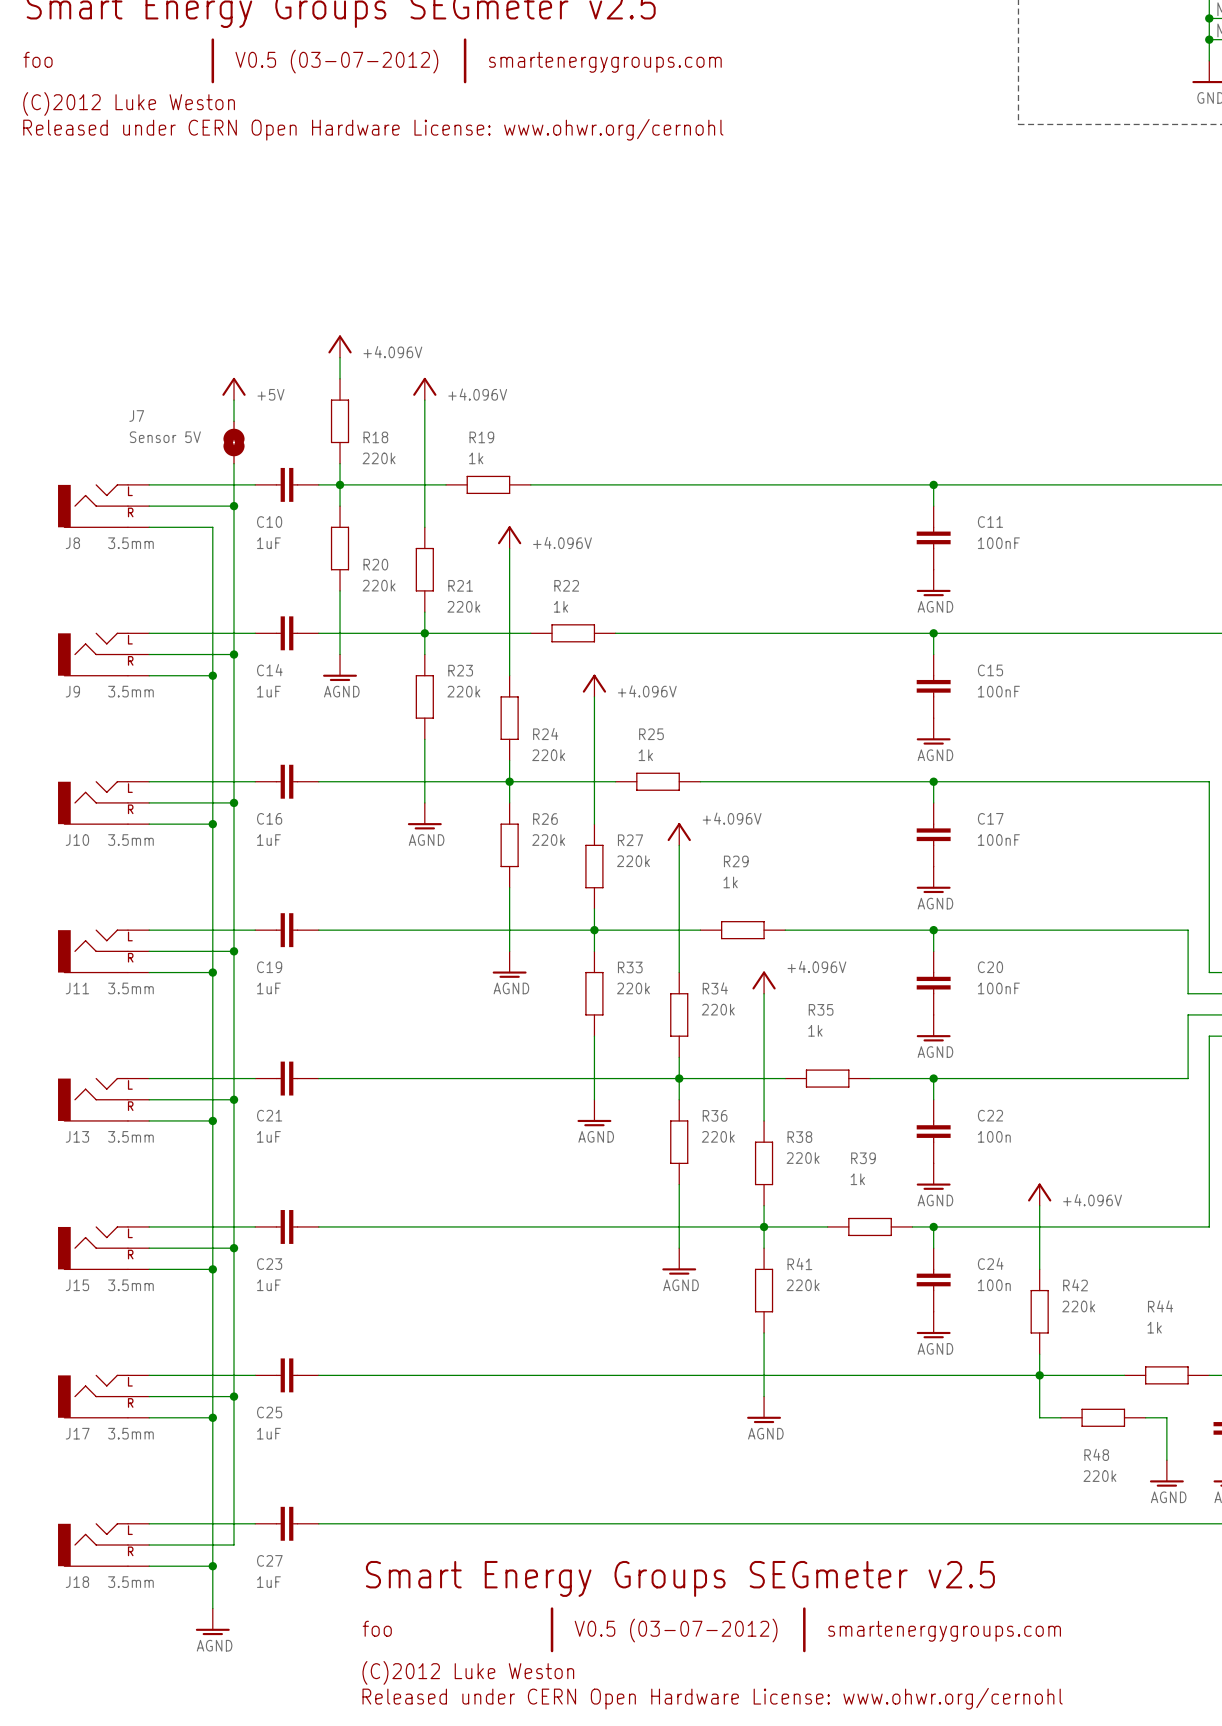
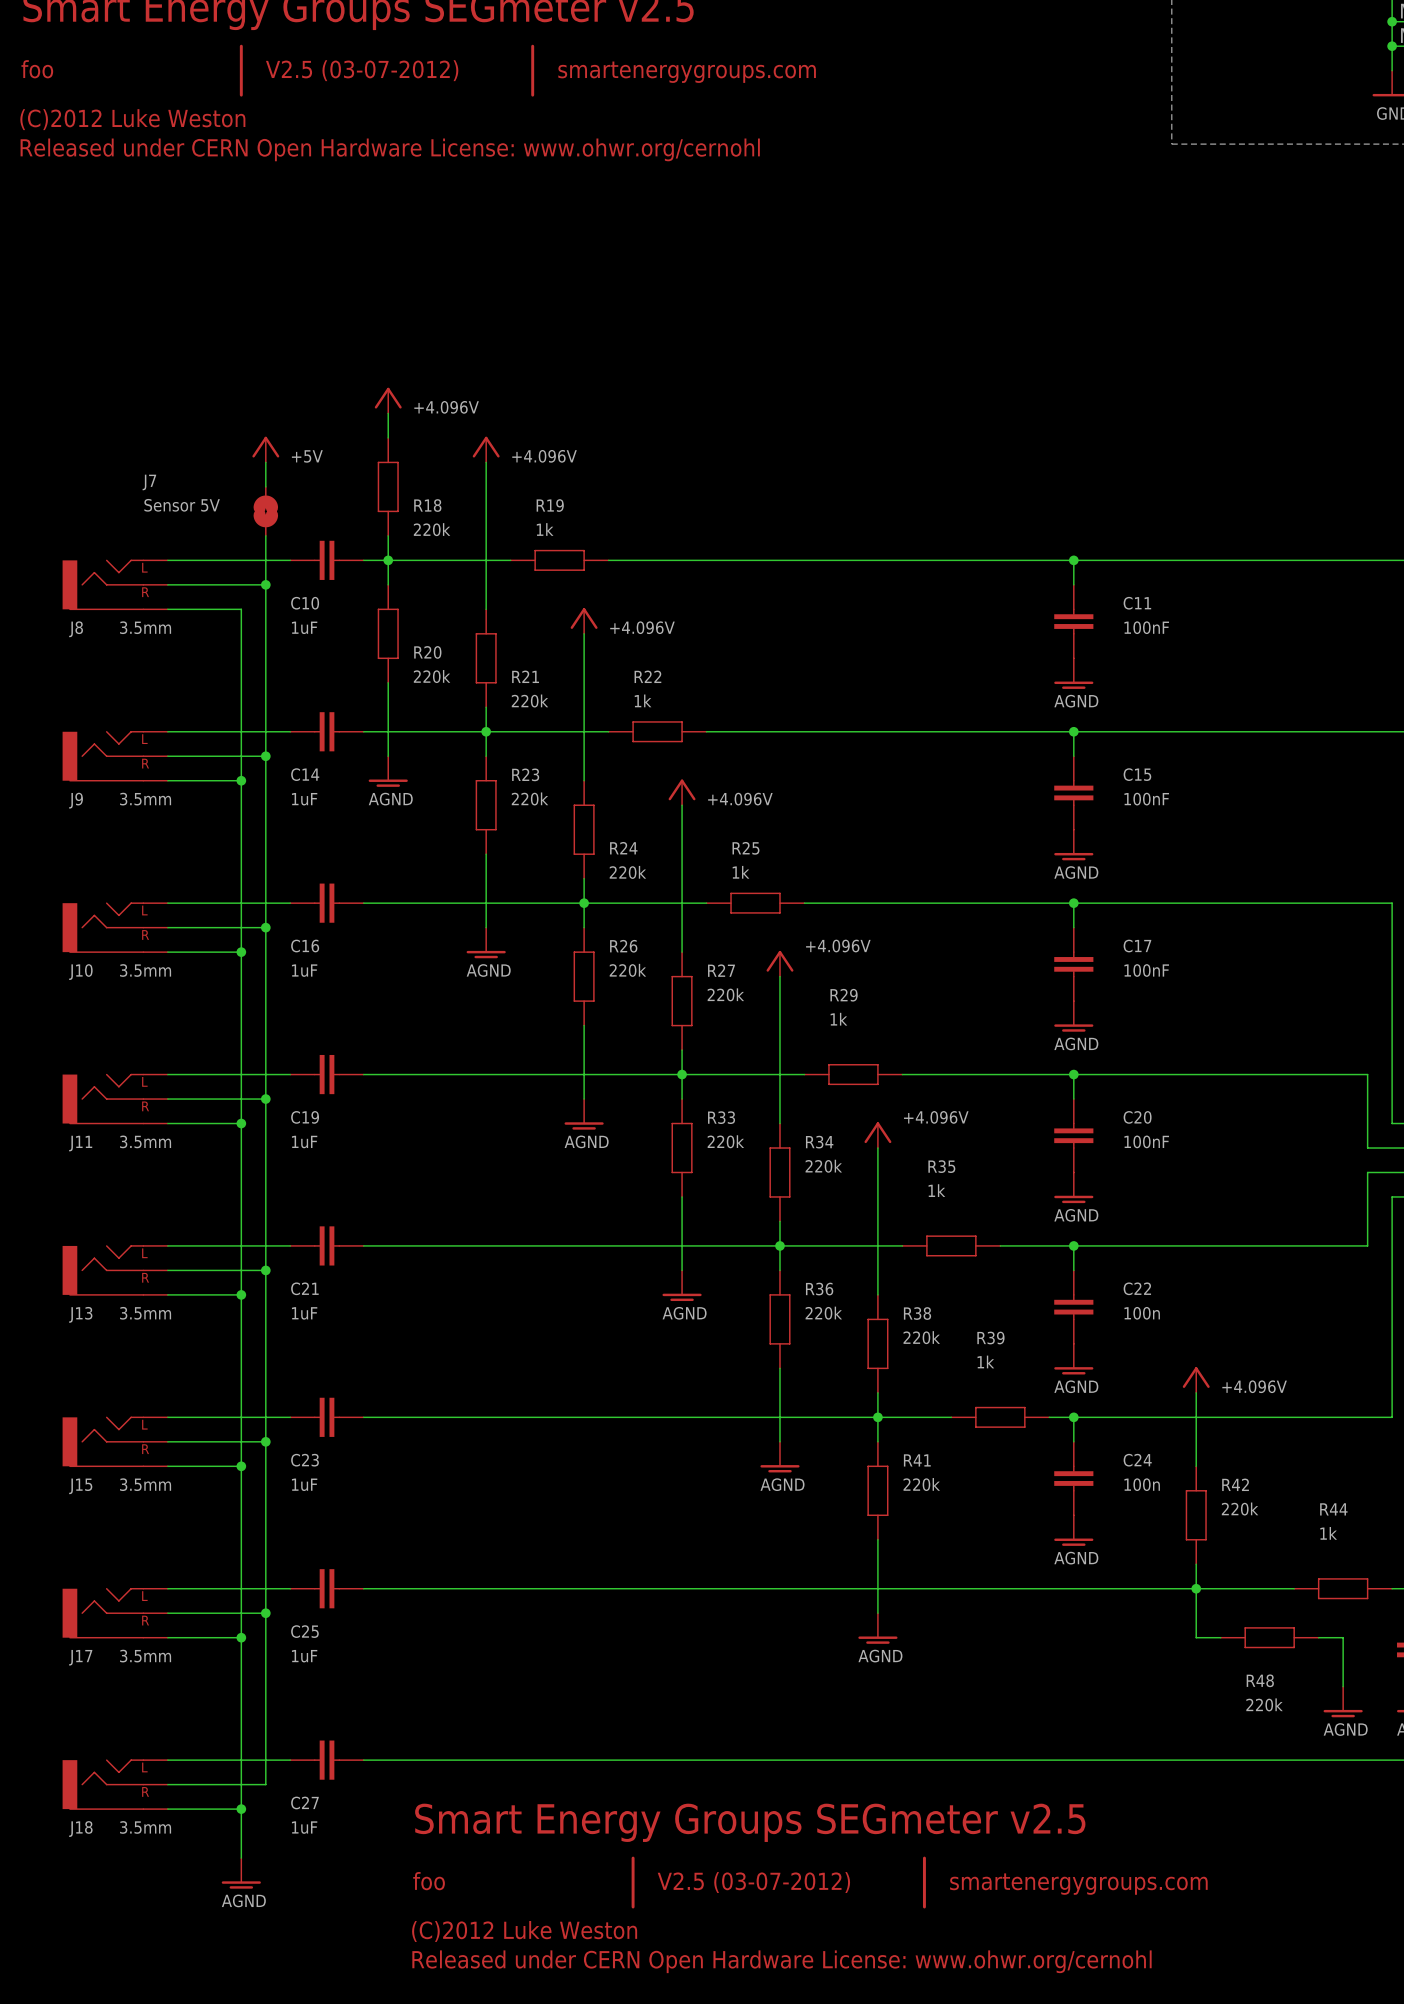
text: V0.5 (03-07-2012) (336, 61) -> V2.5 (03-07-2012) (362, 70)
text: V0.5 (03-07-2012) (676, 1630) -> V2.5 (03-07-2012) (753, 1882)

